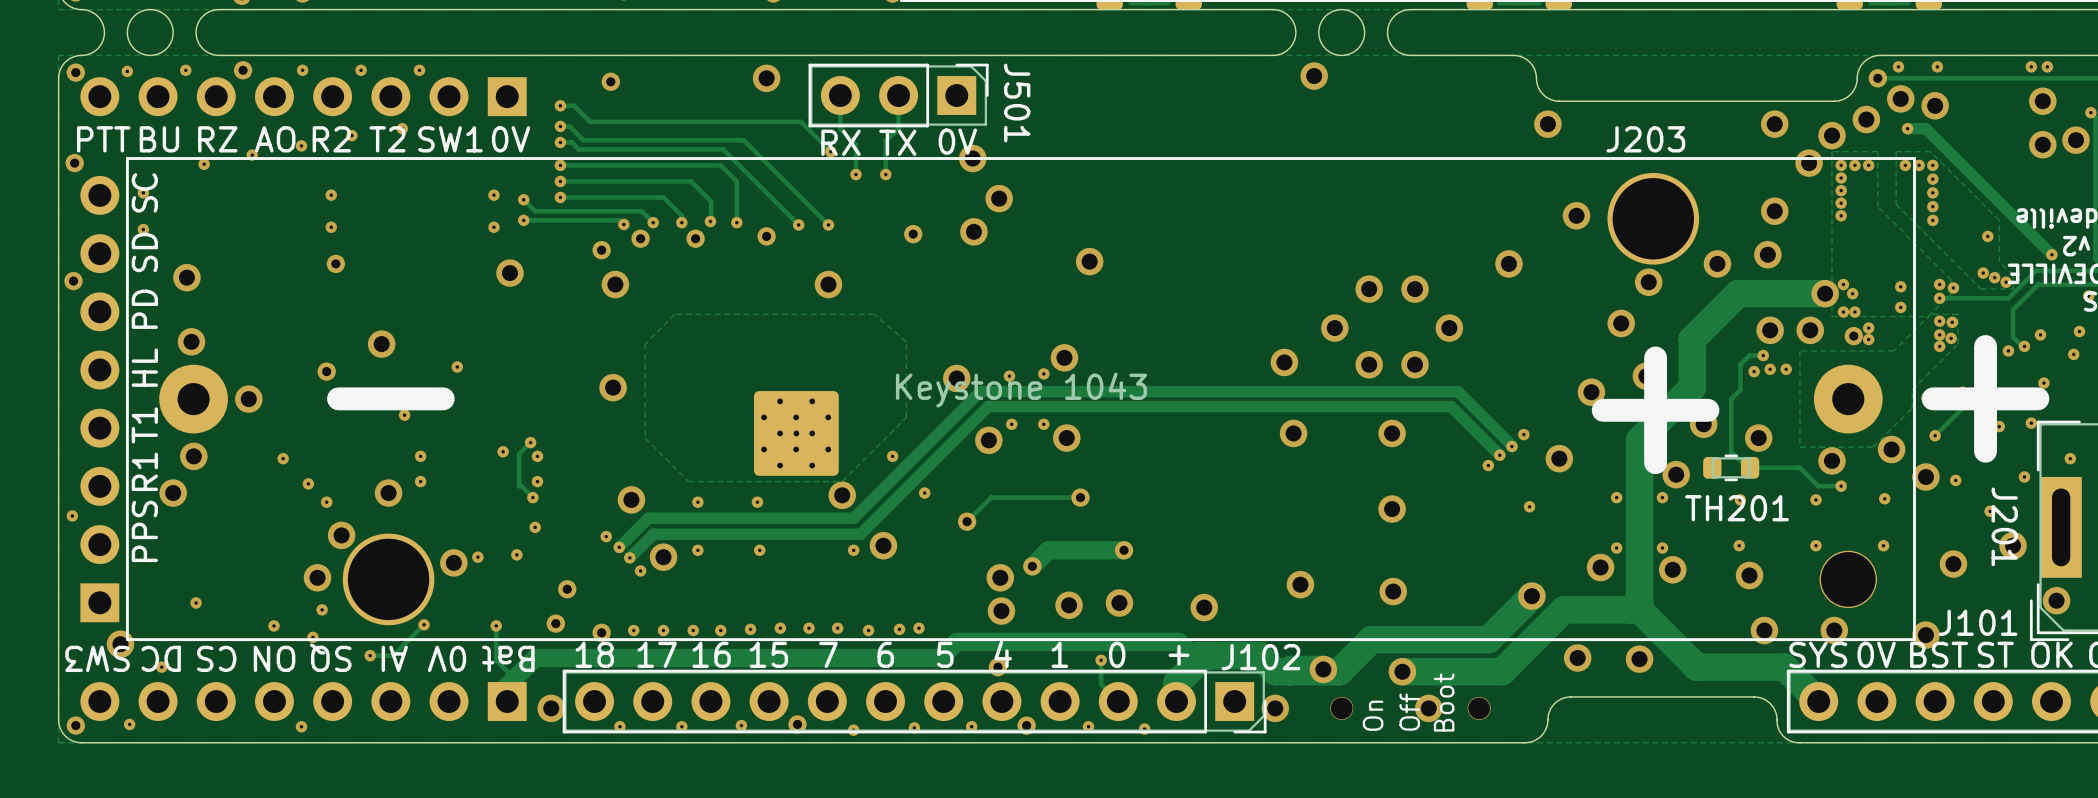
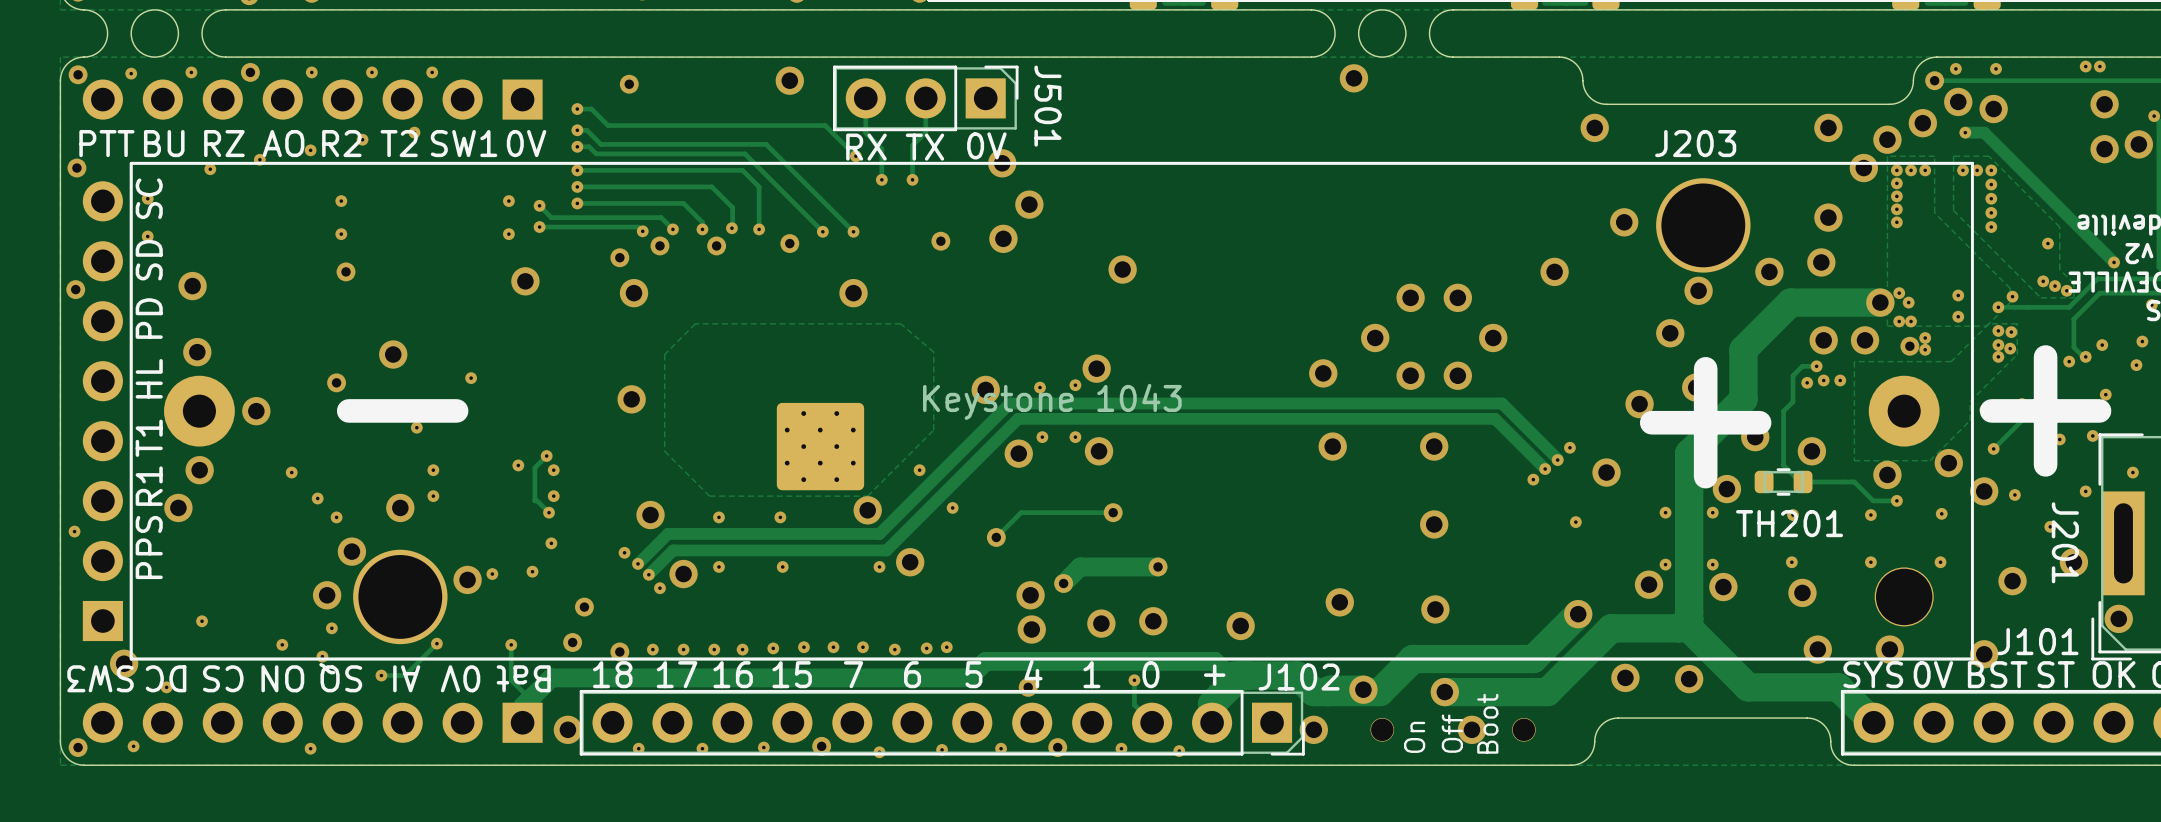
via: none -> (2085, 66)
via: none -> (2099, 66)
via: (2031, 66) -> none
via: (2047, 66) -> none
via: (1939, 284) -> none
part footprint: [754, 391, 839, 476] -> [776, 402, 865, 491]

